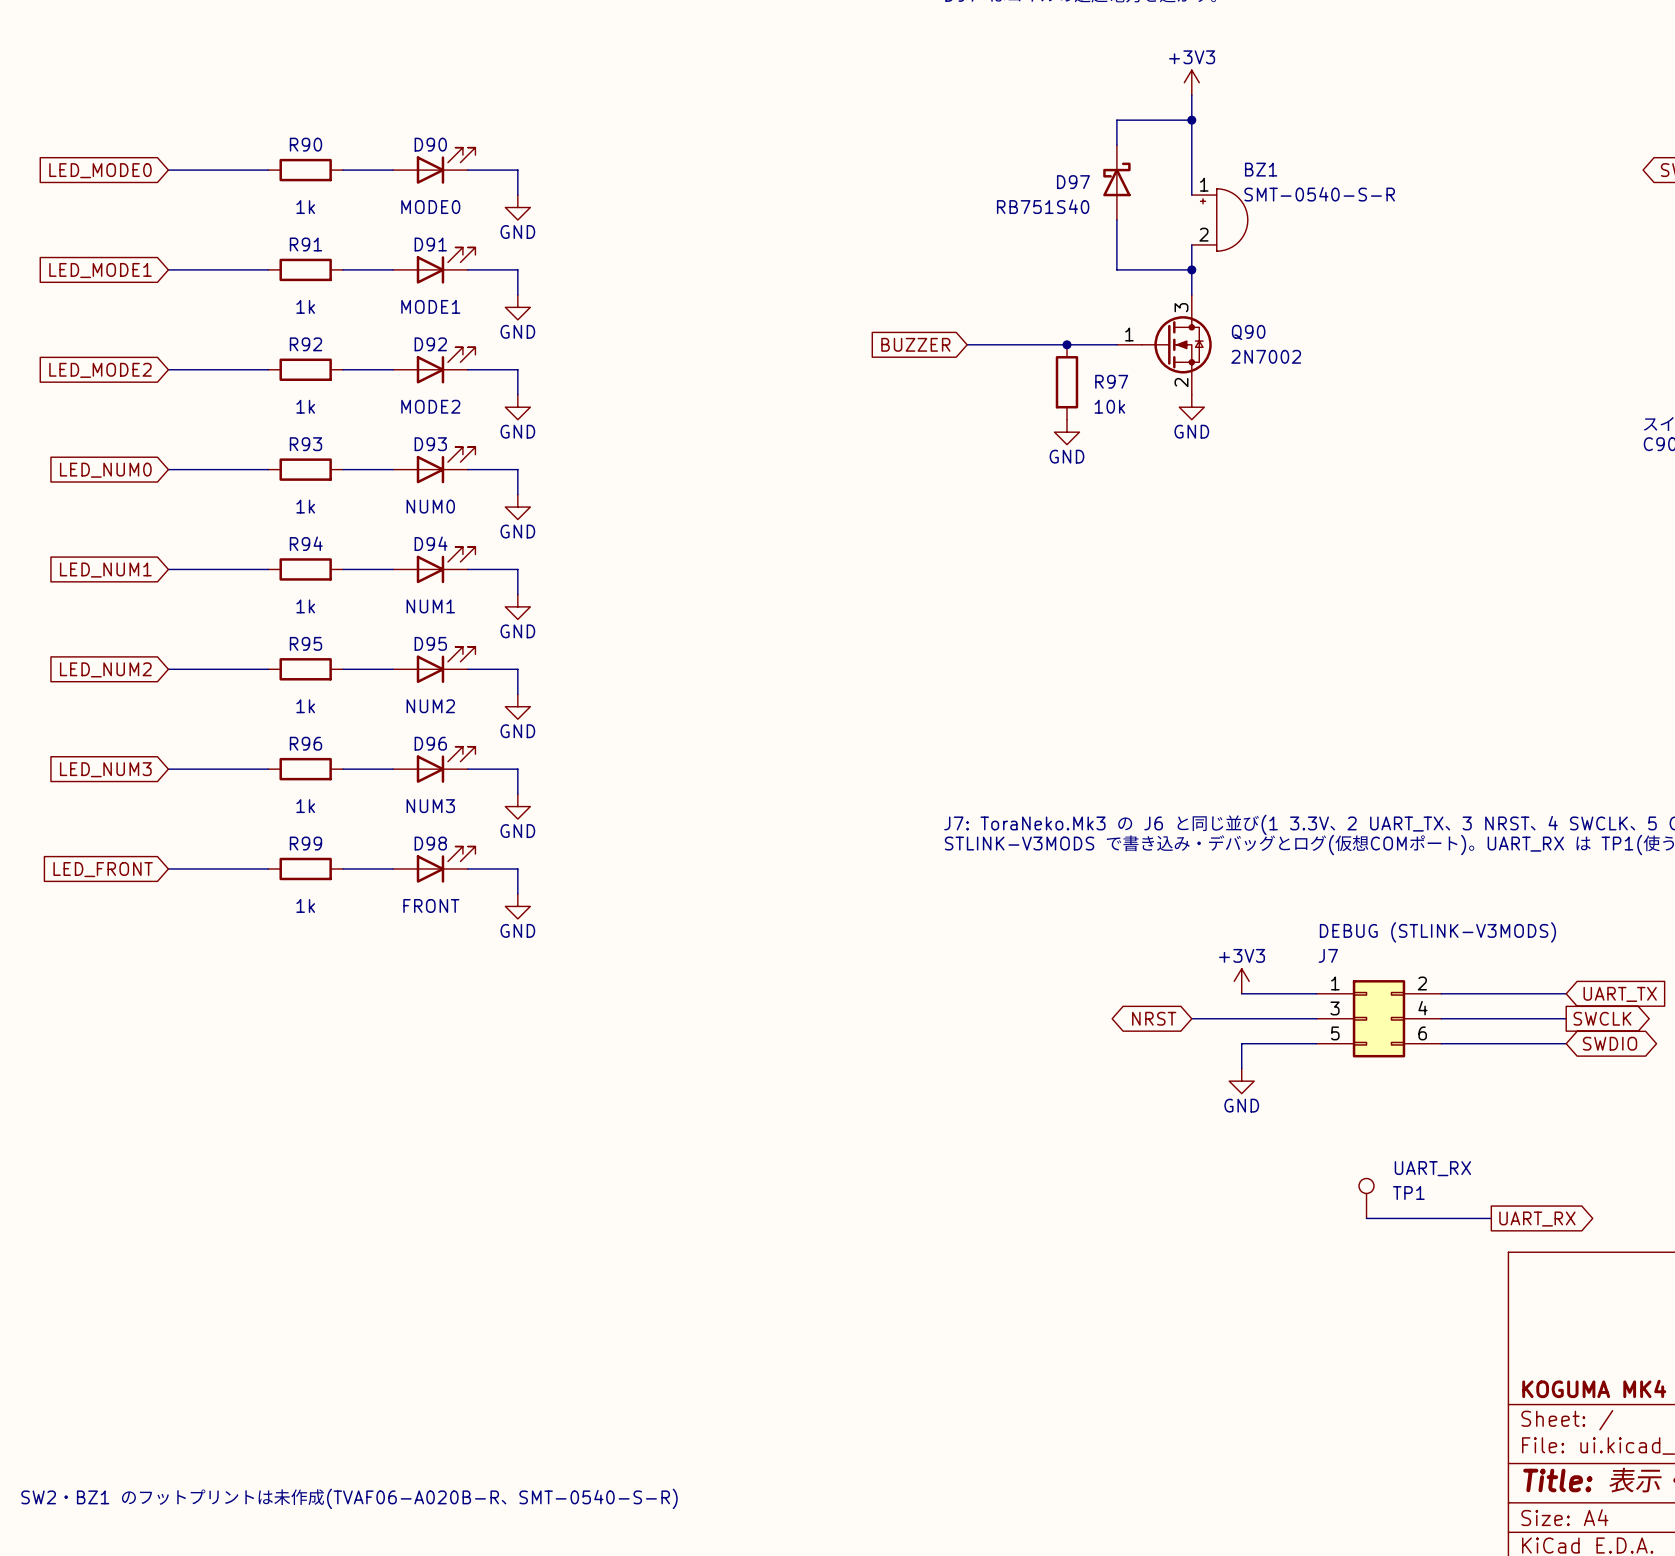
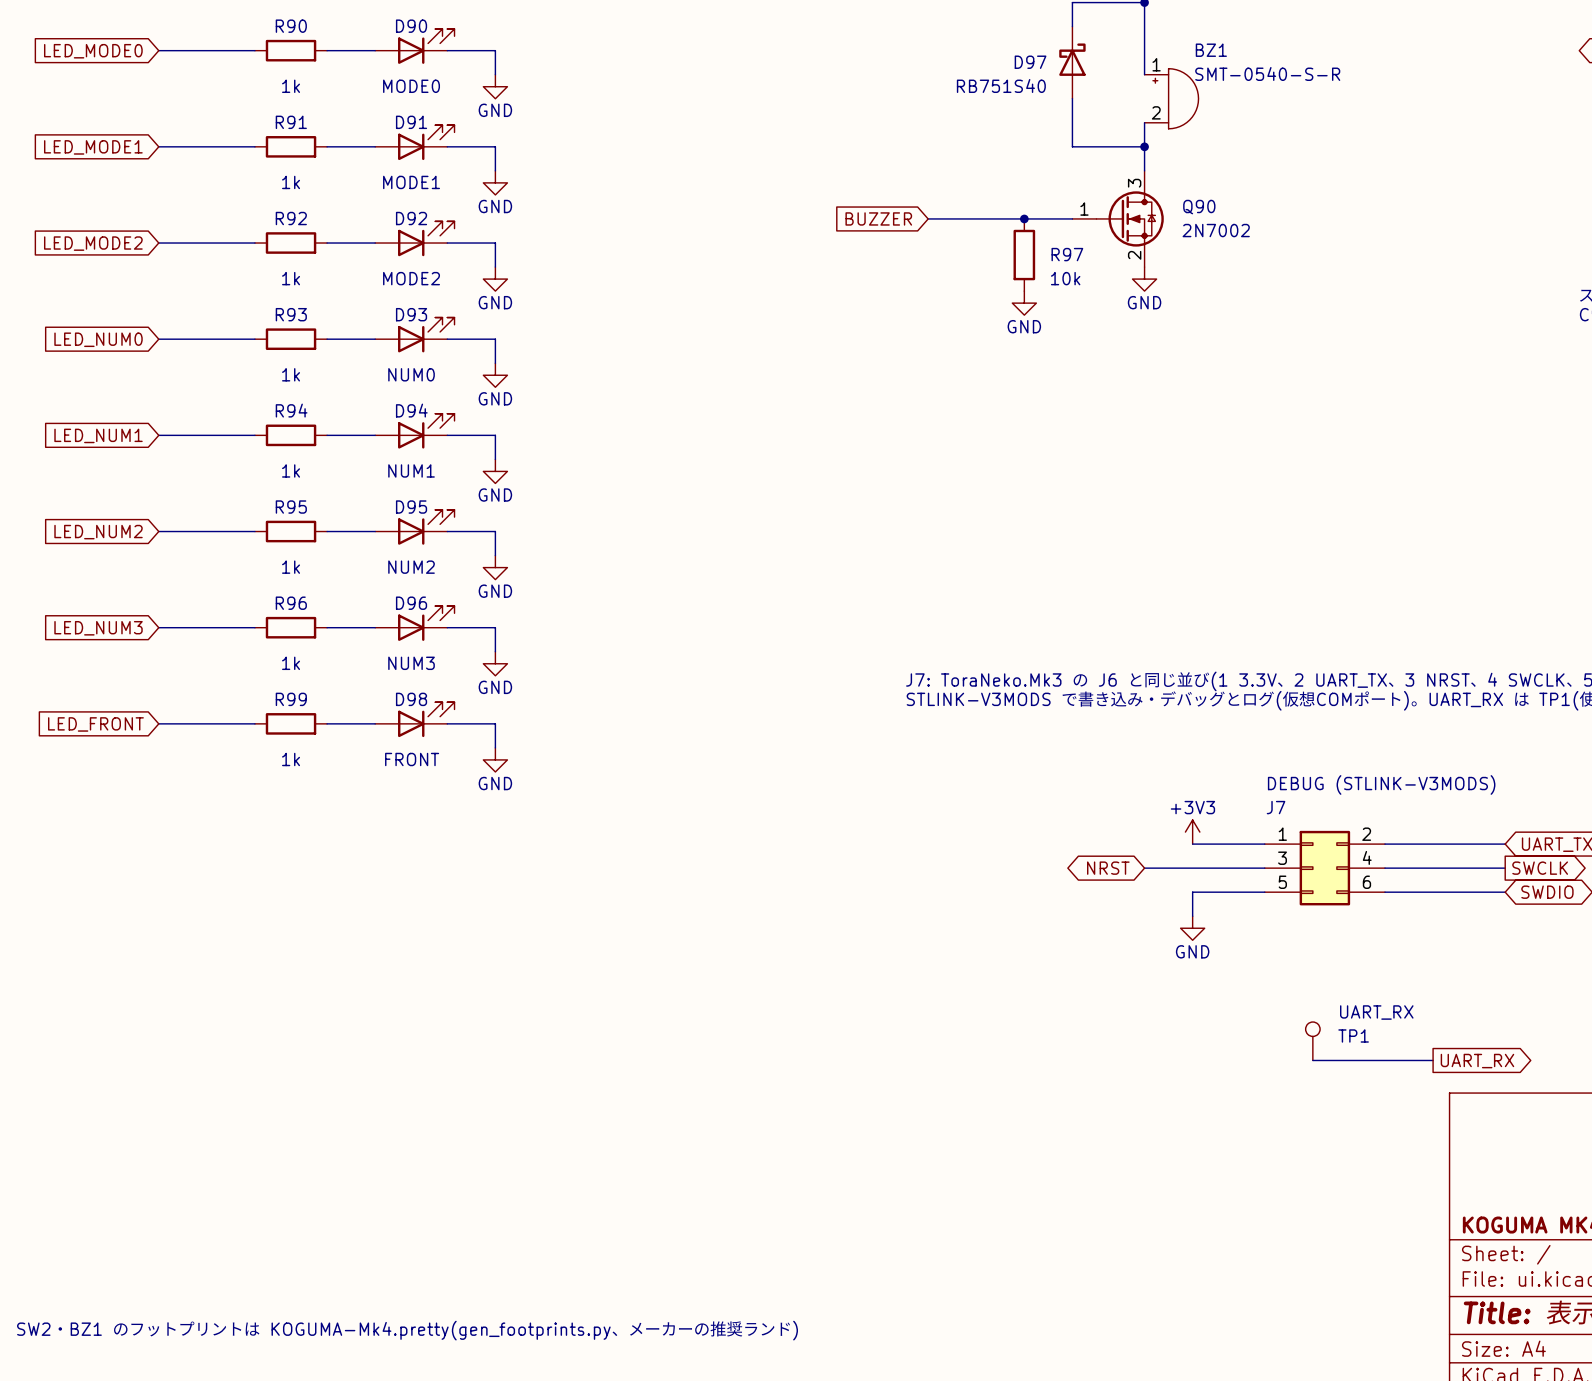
text: SW2・BZ1 のフットプリントは未作成(TVAF06-A020B-R、SMT-0540-S-R) (349, 1498) -> SW2・BZ1 のフットプリントは KOGUMA-Mk4.pretty(gen_footprints.py、メーカーの推奨ランド) (407, 1330)

